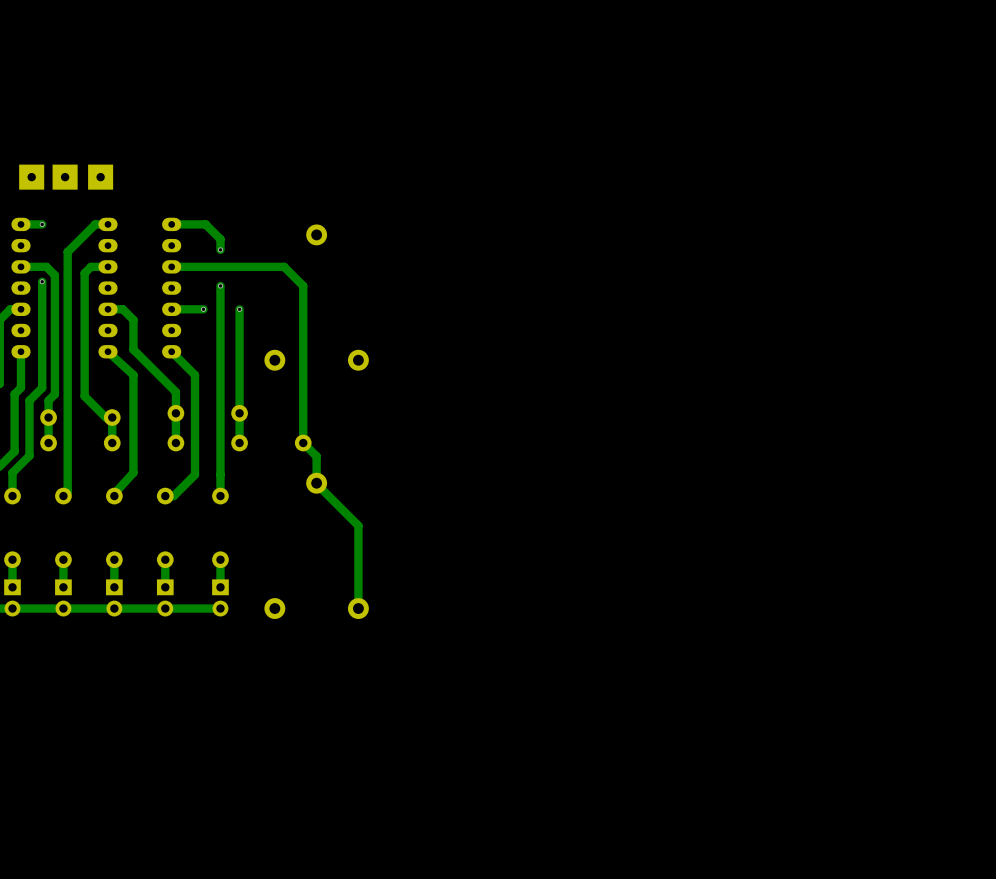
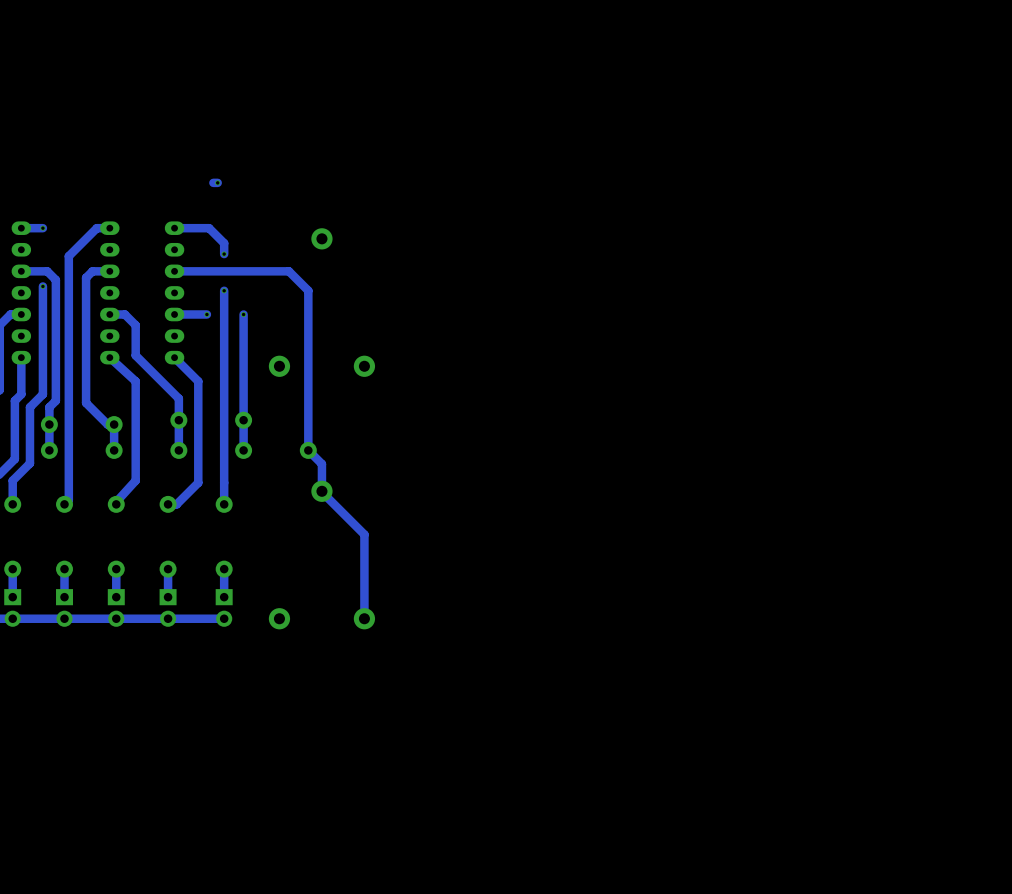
part: (31, 177) -> none
part: (65, 177) -> none
part: (100, 177) -> none
track: none -> (217, 182) (213, 182)
via: none -> (217, 182)

